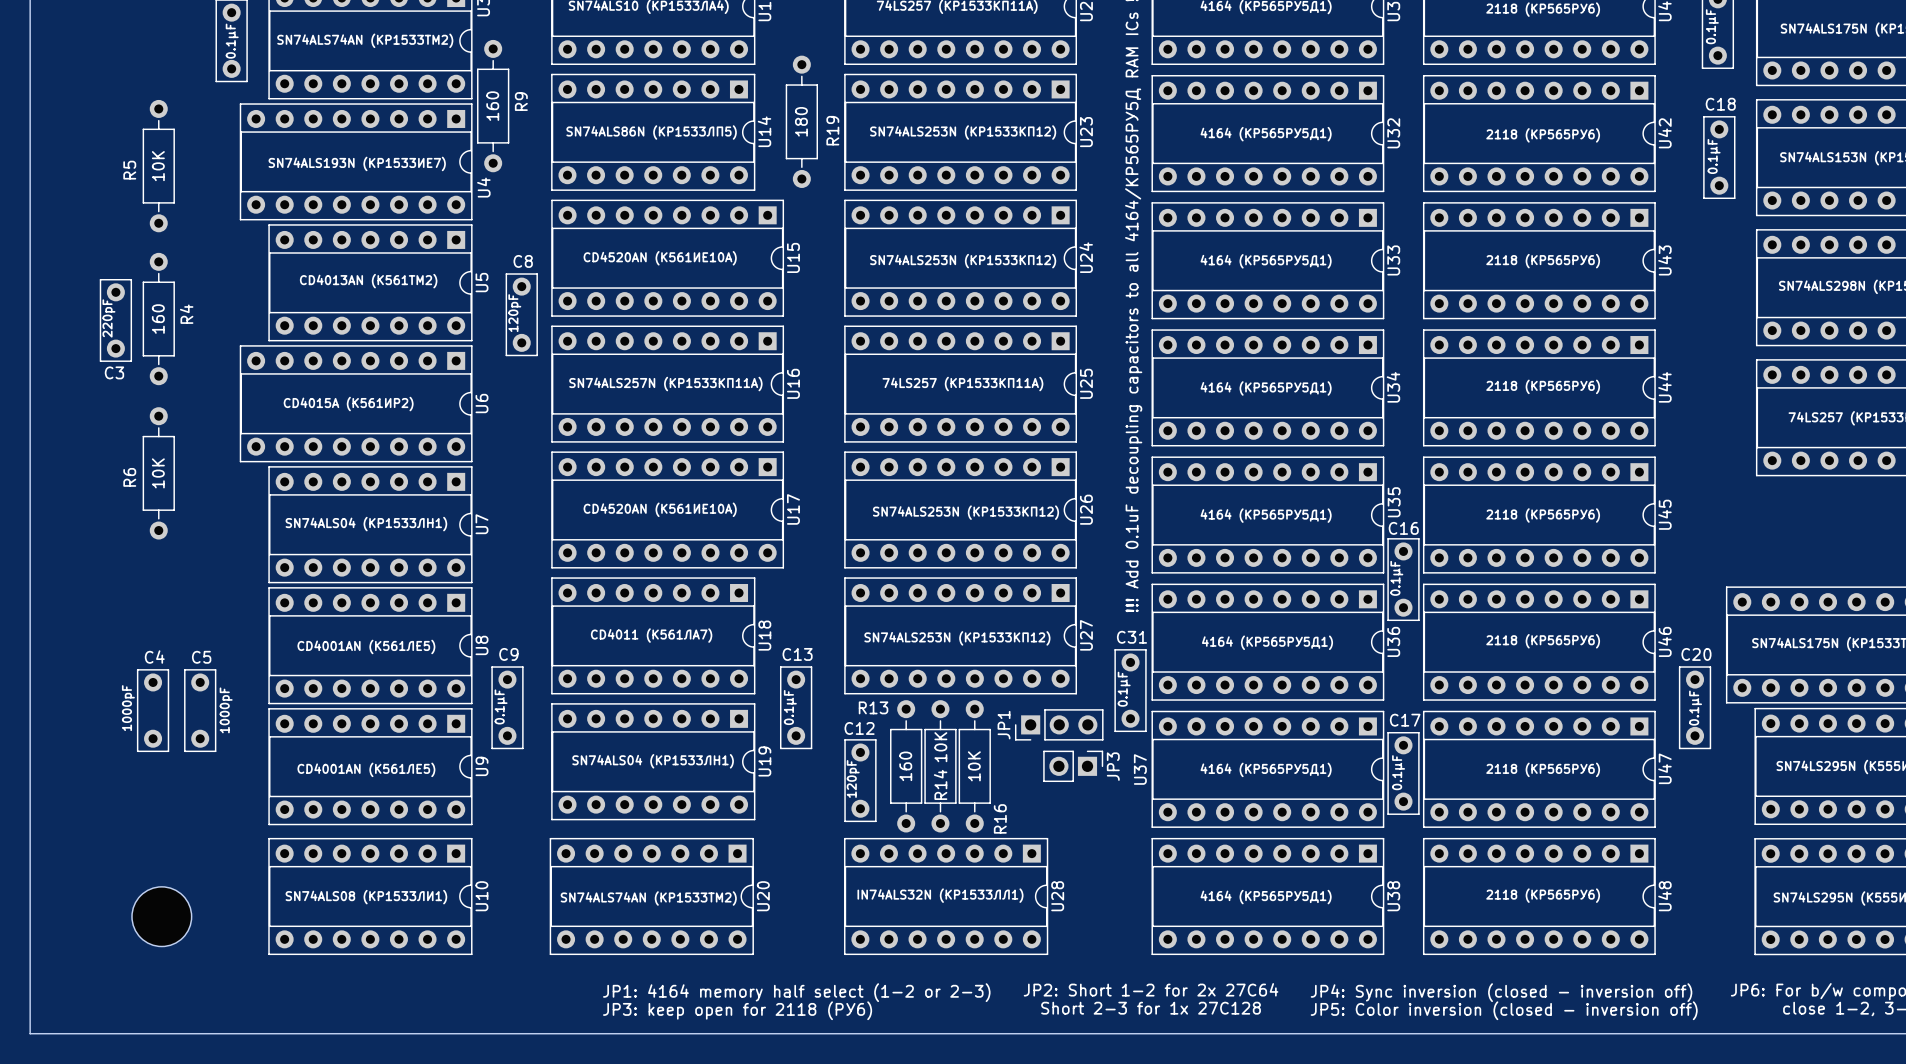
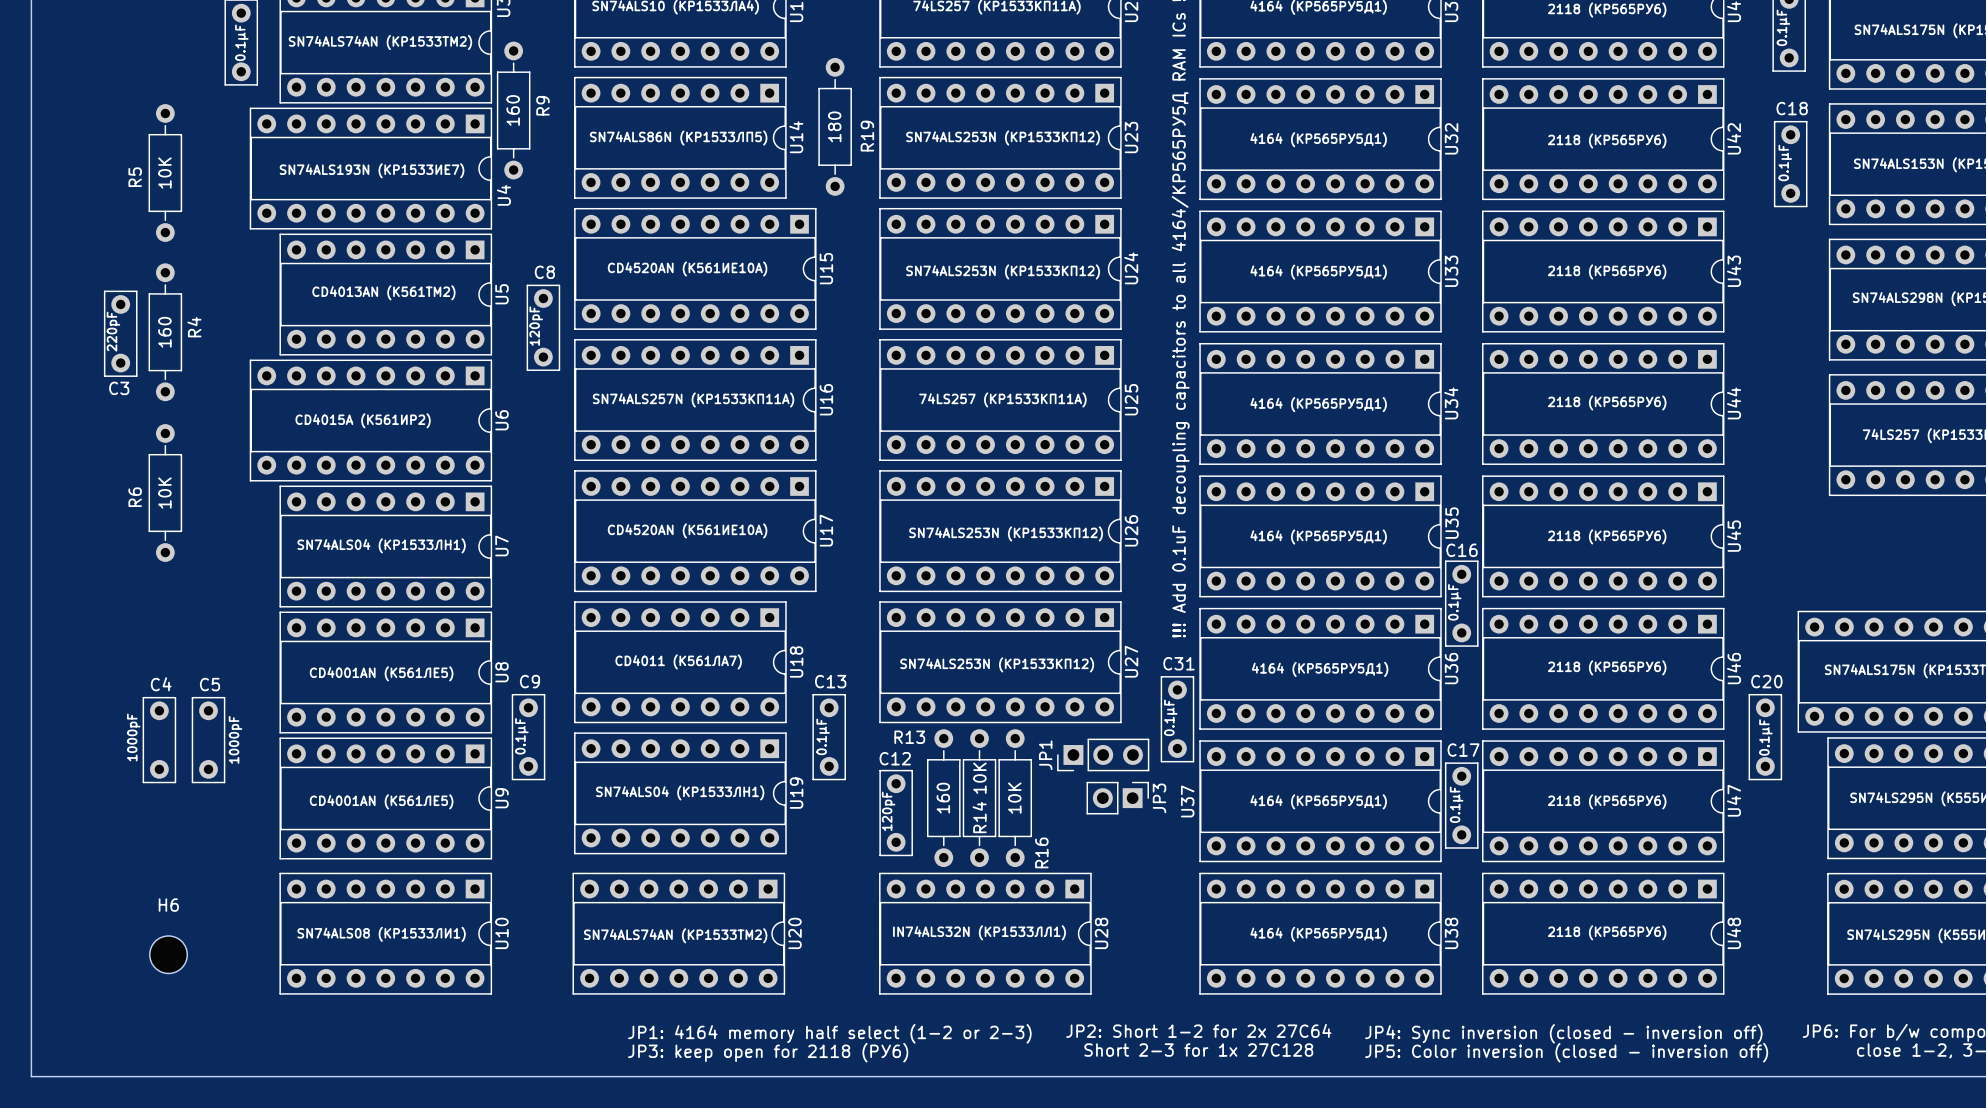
part: (161, 916) -> none
H6: none -> (168, 954)

